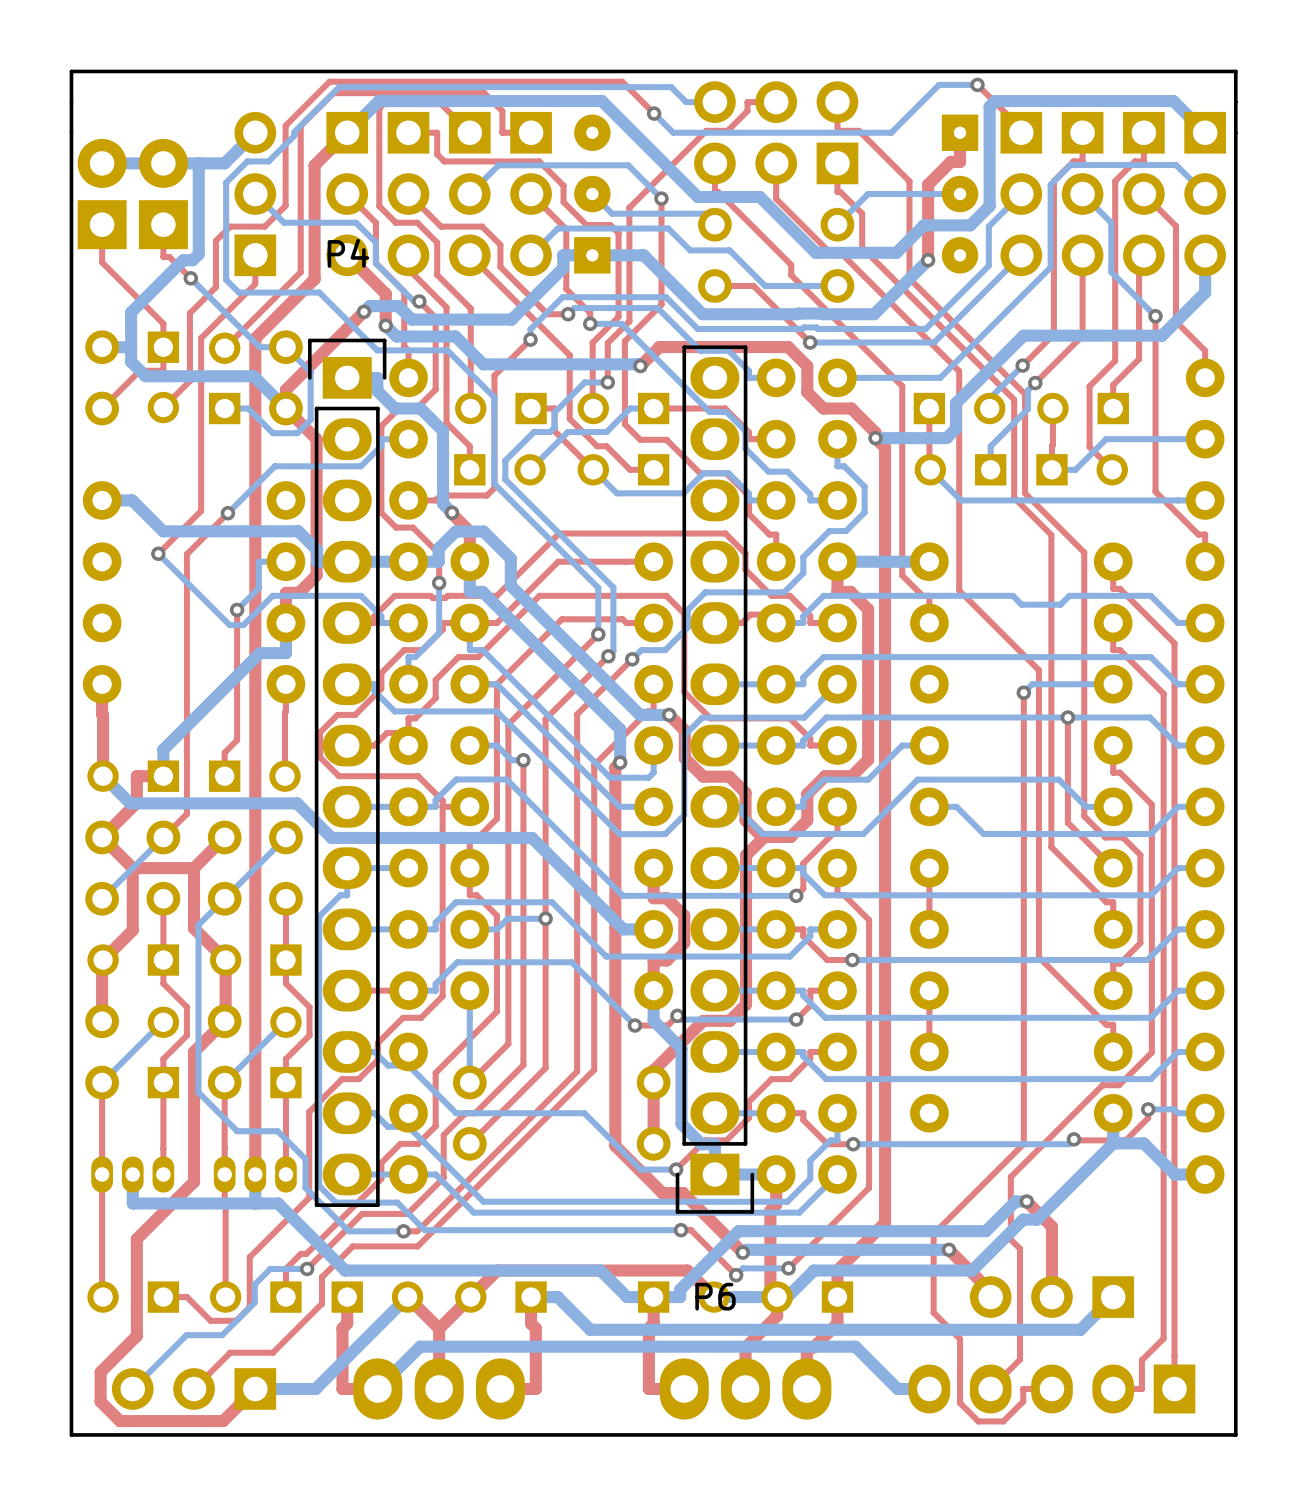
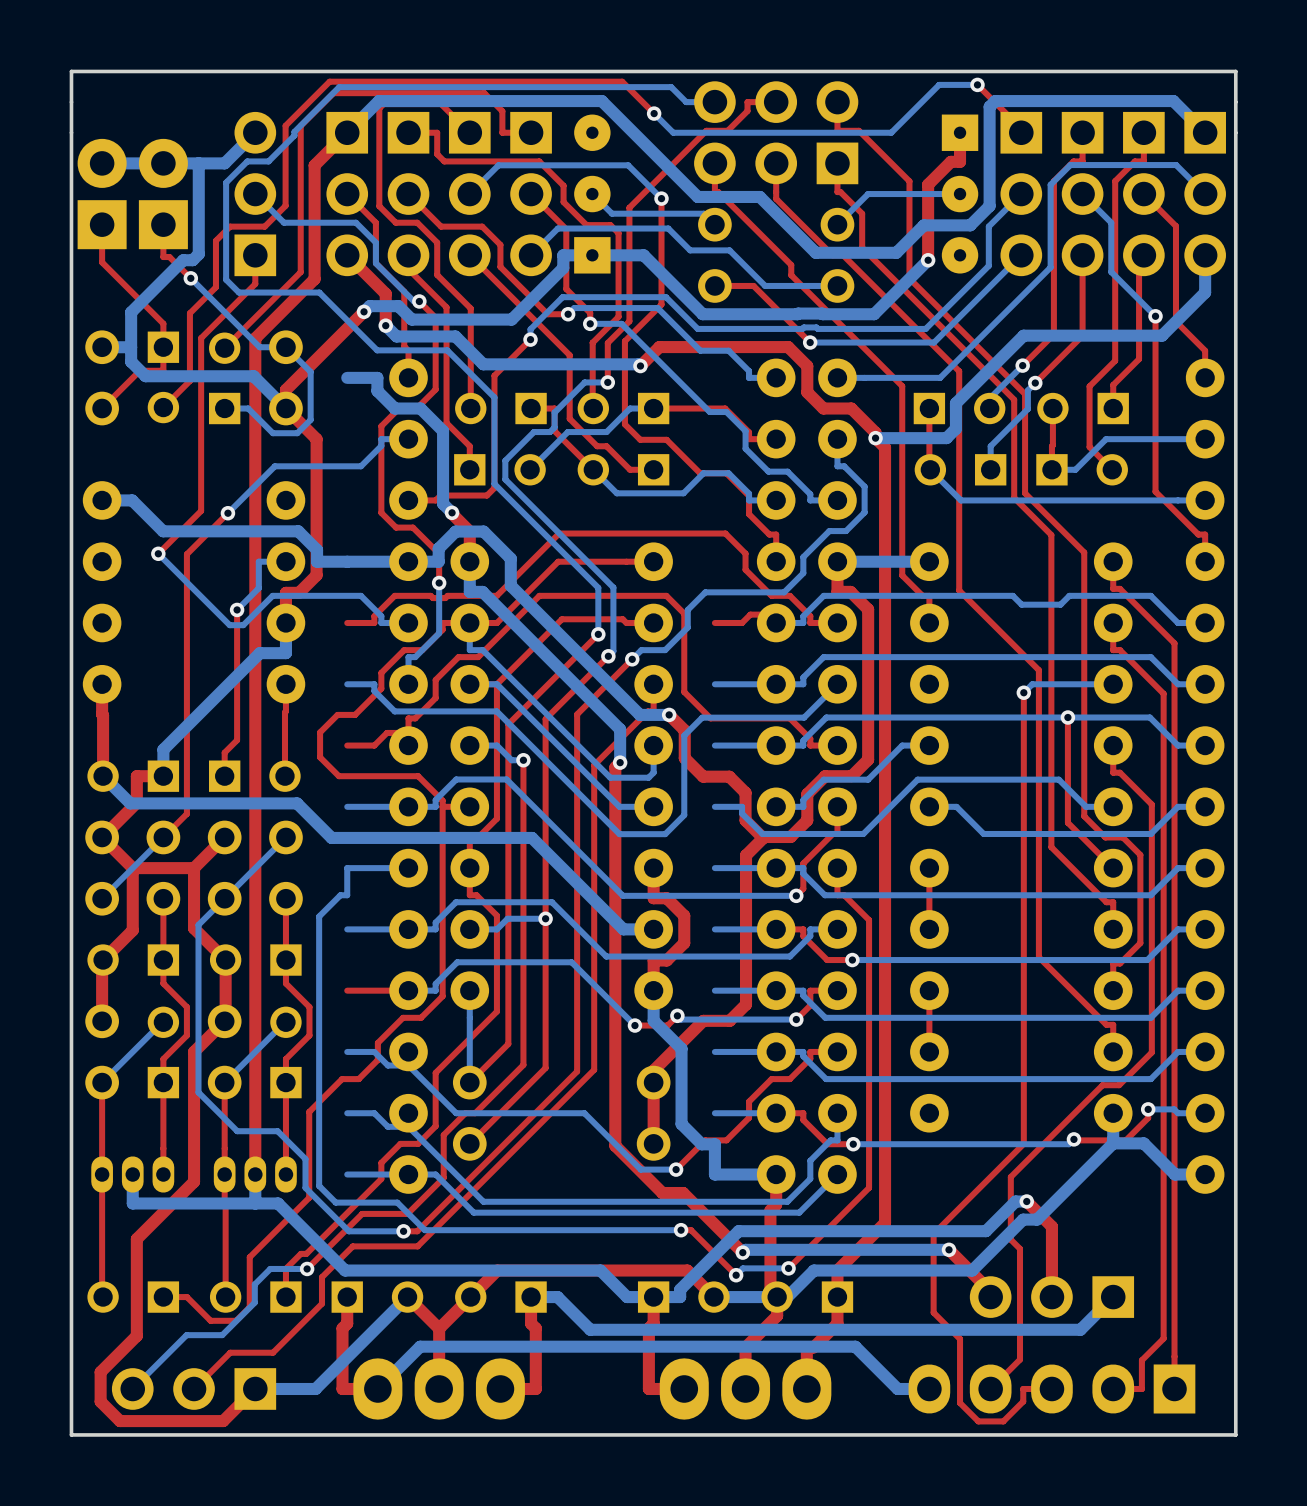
P4: (347, 772) -> none
P6: (714, 779) -> none

